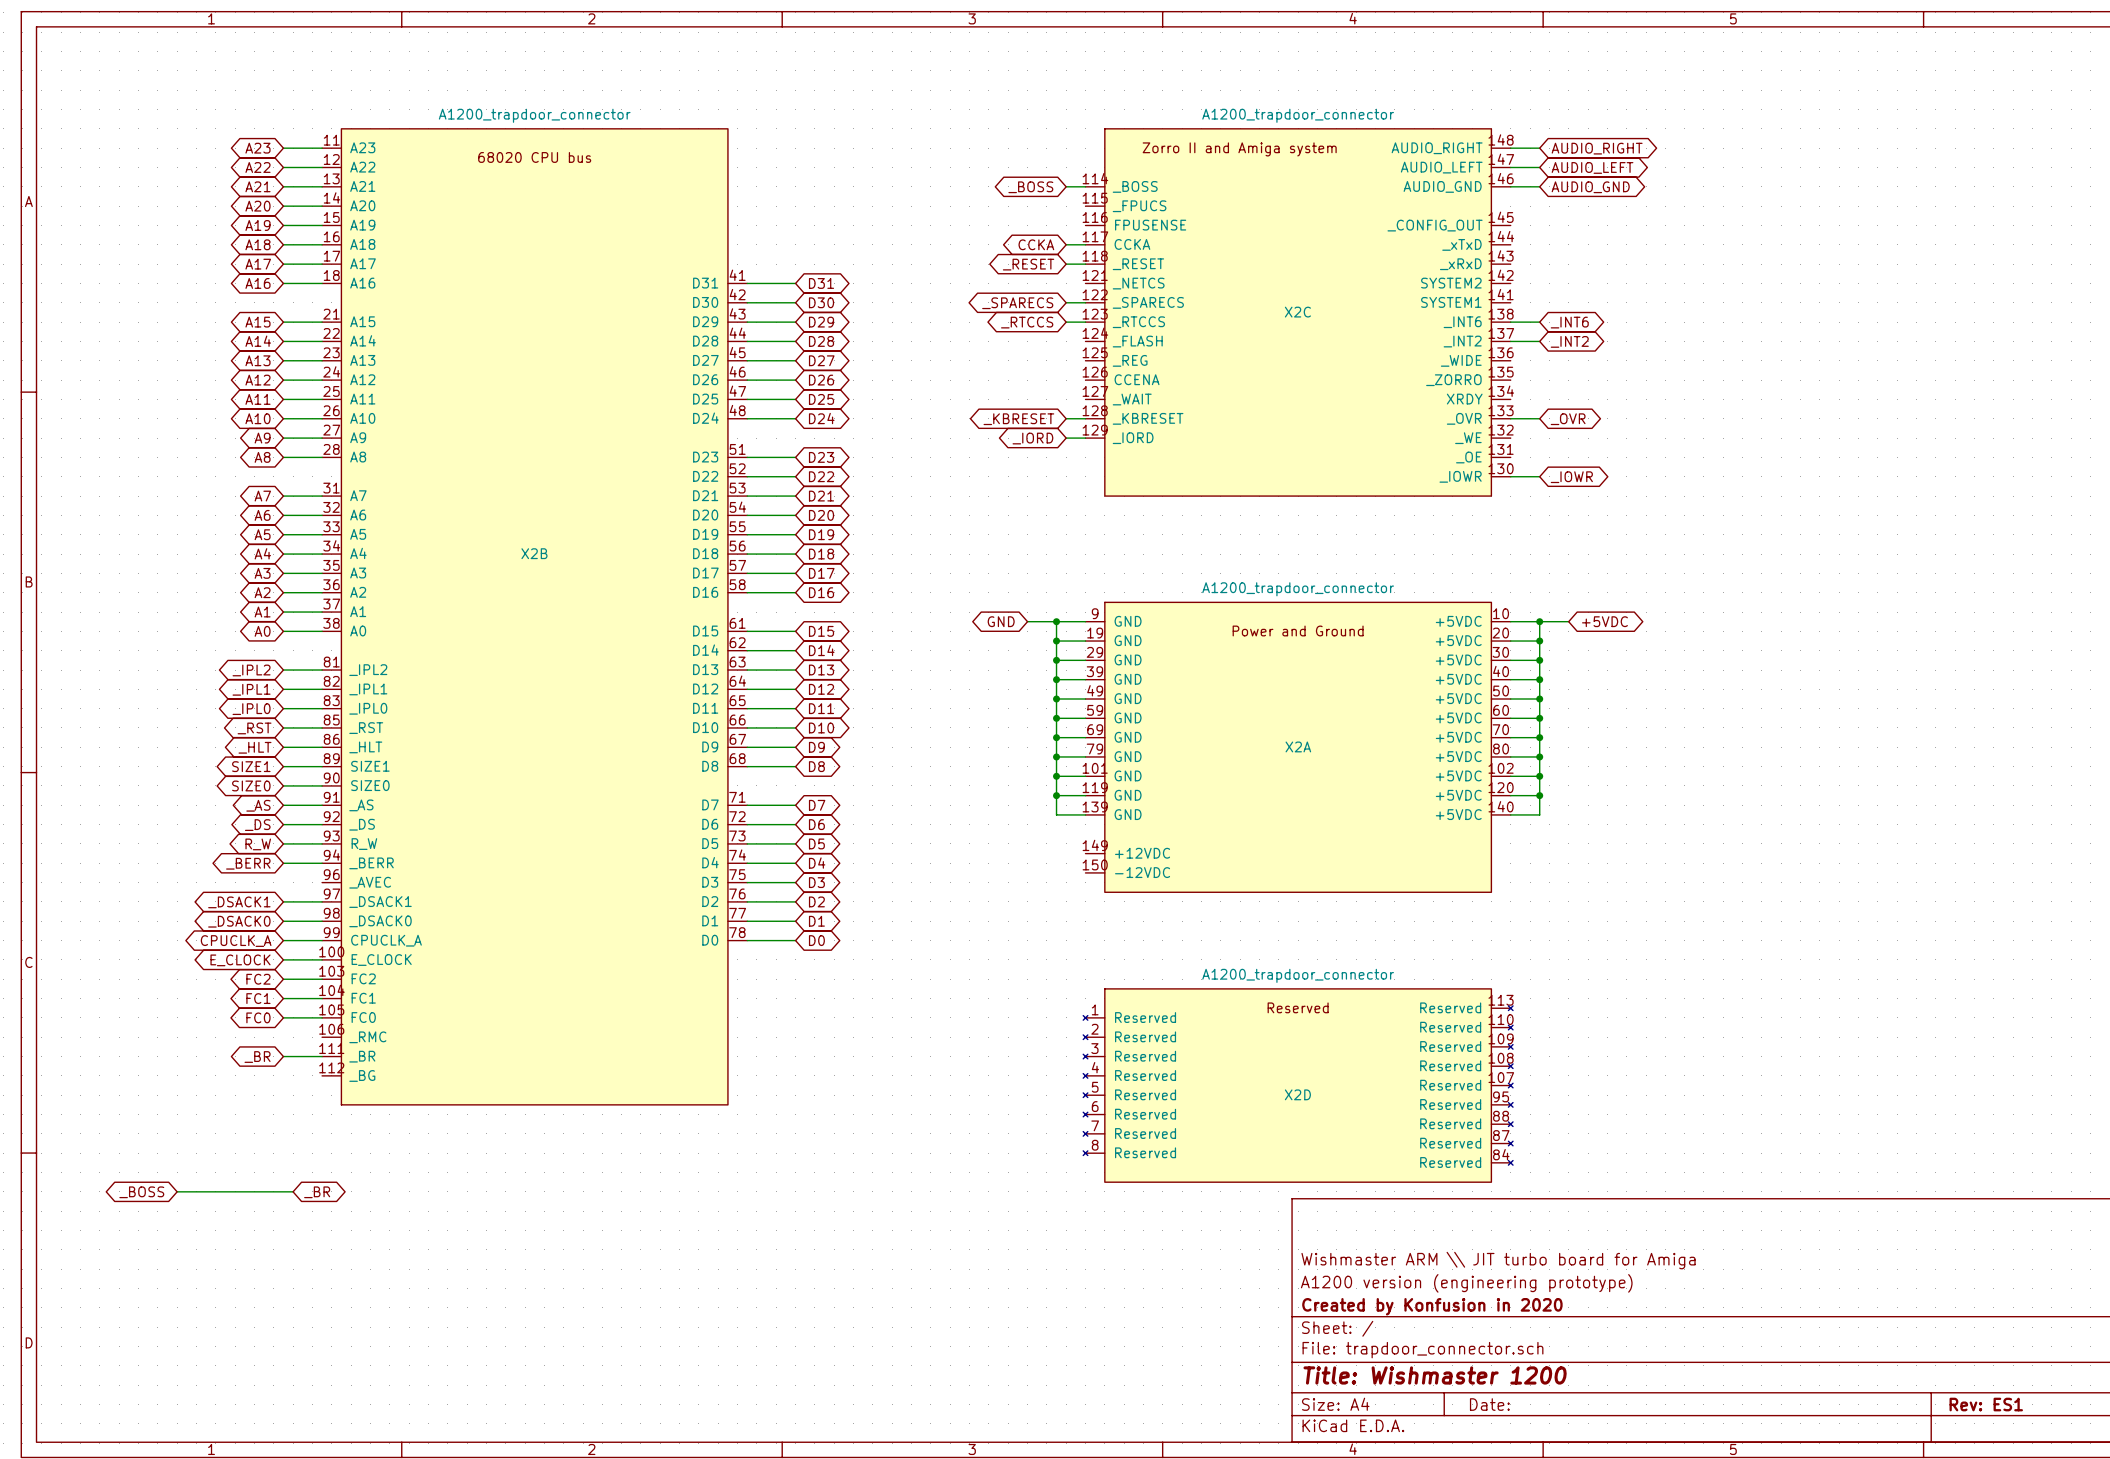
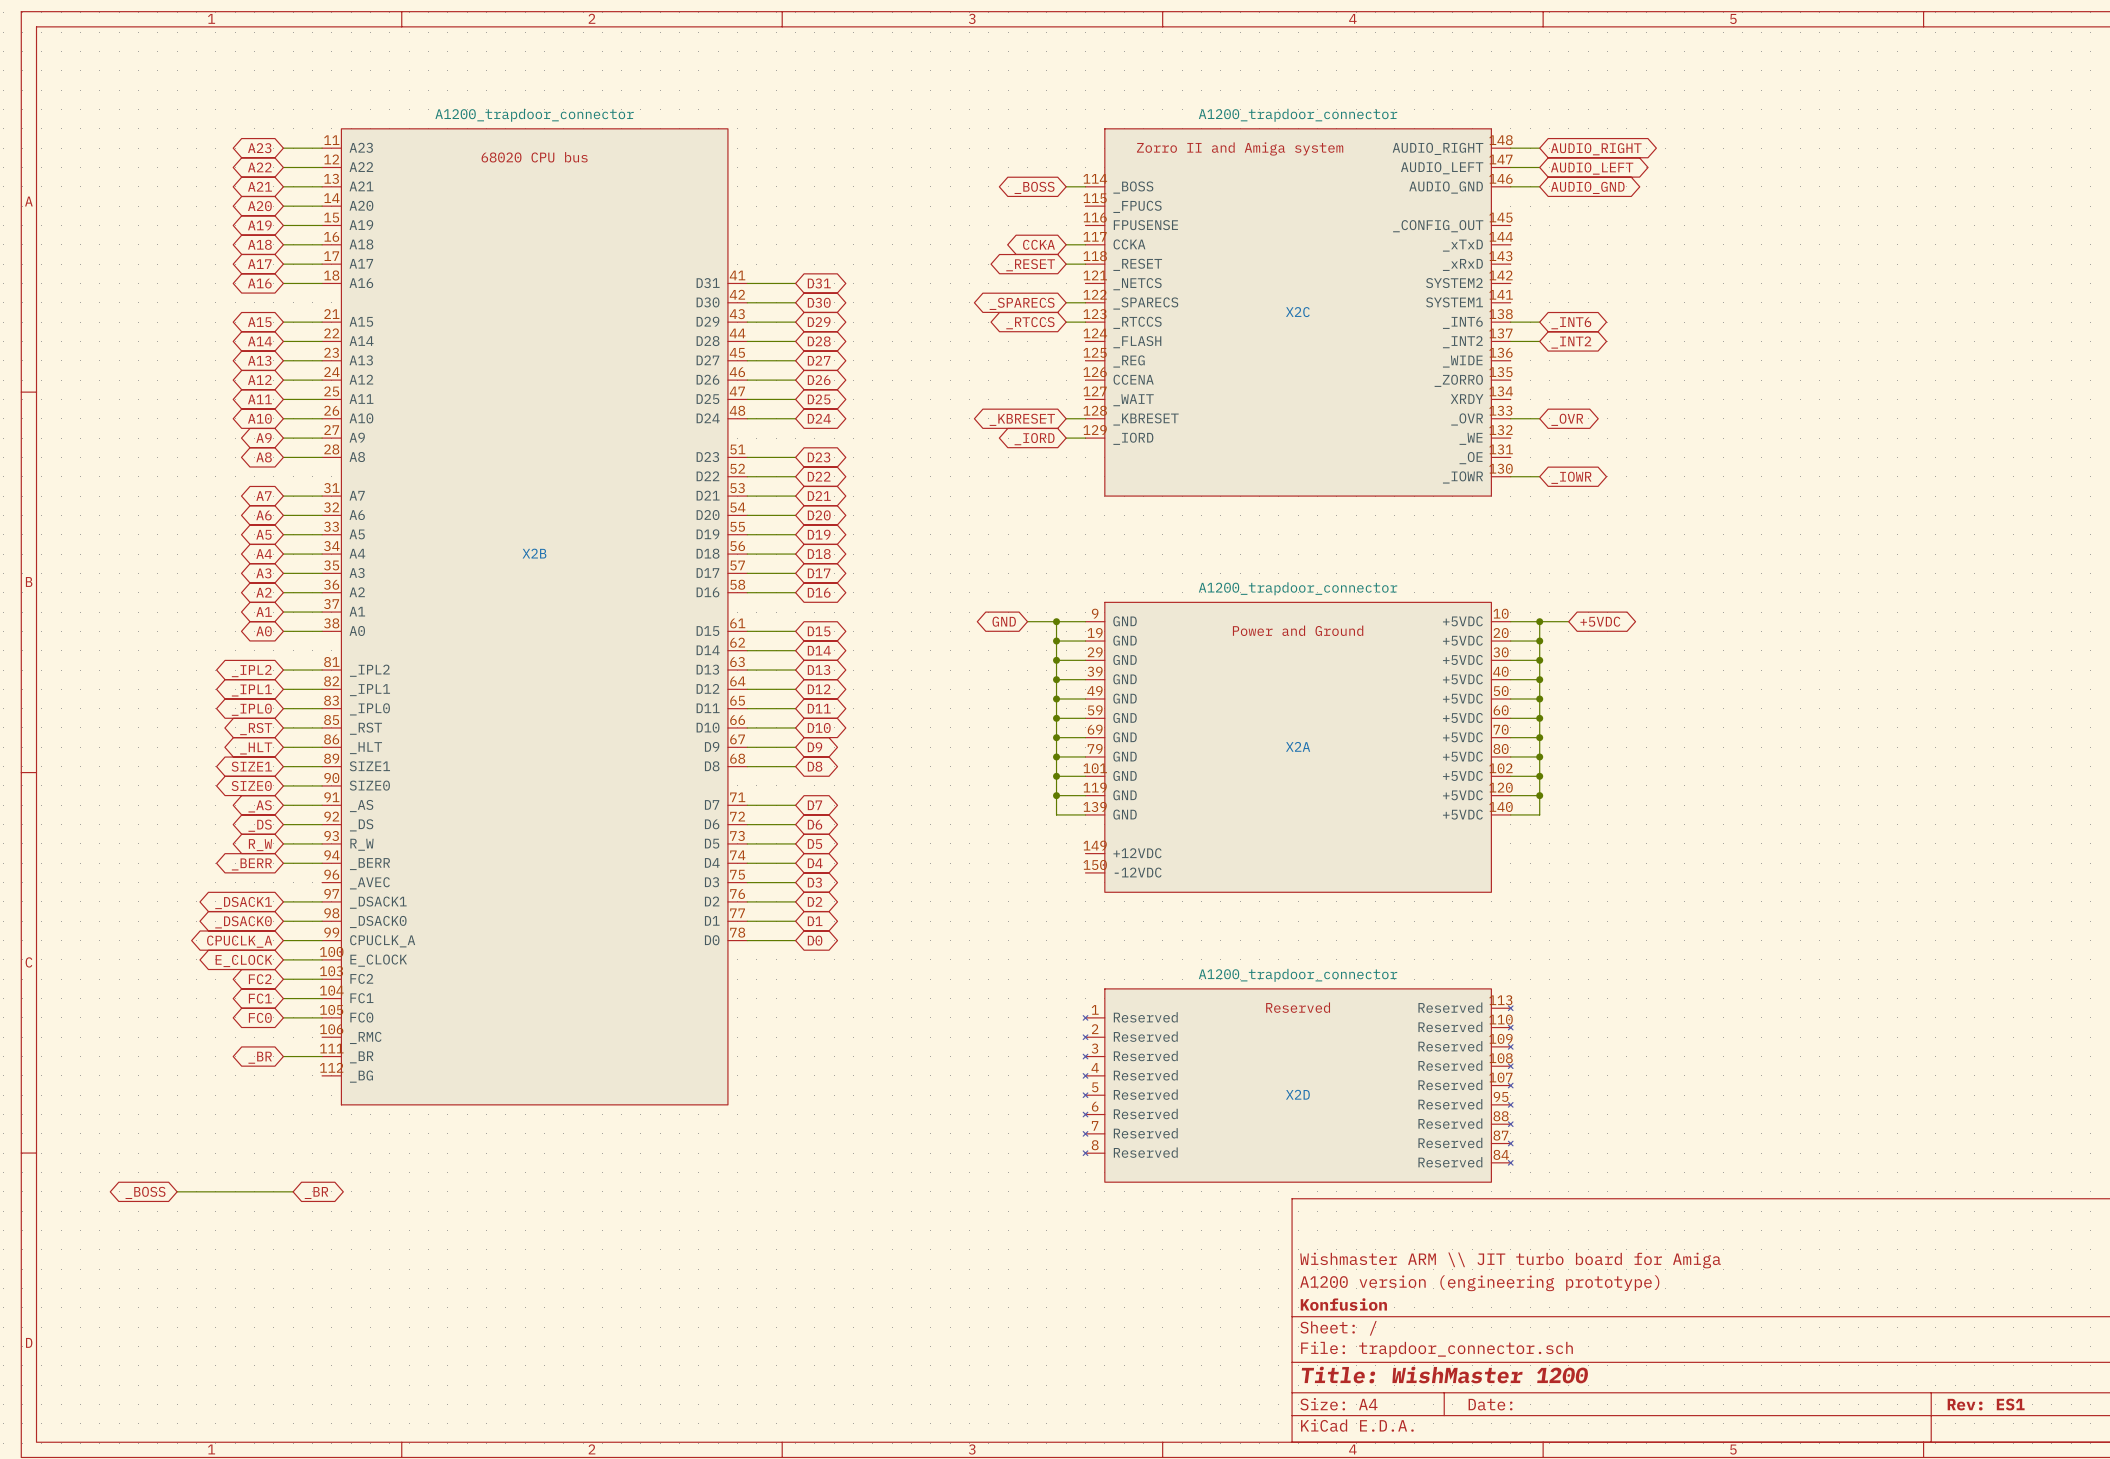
title block: Created by Konfusion in 2020 (1432, 1306) -> Konfusion (1343, 1304)
title block: Title: Wishmaster 1200 (1435, 1375) -> Title: WishMaster 1200 (1445, 1375)

